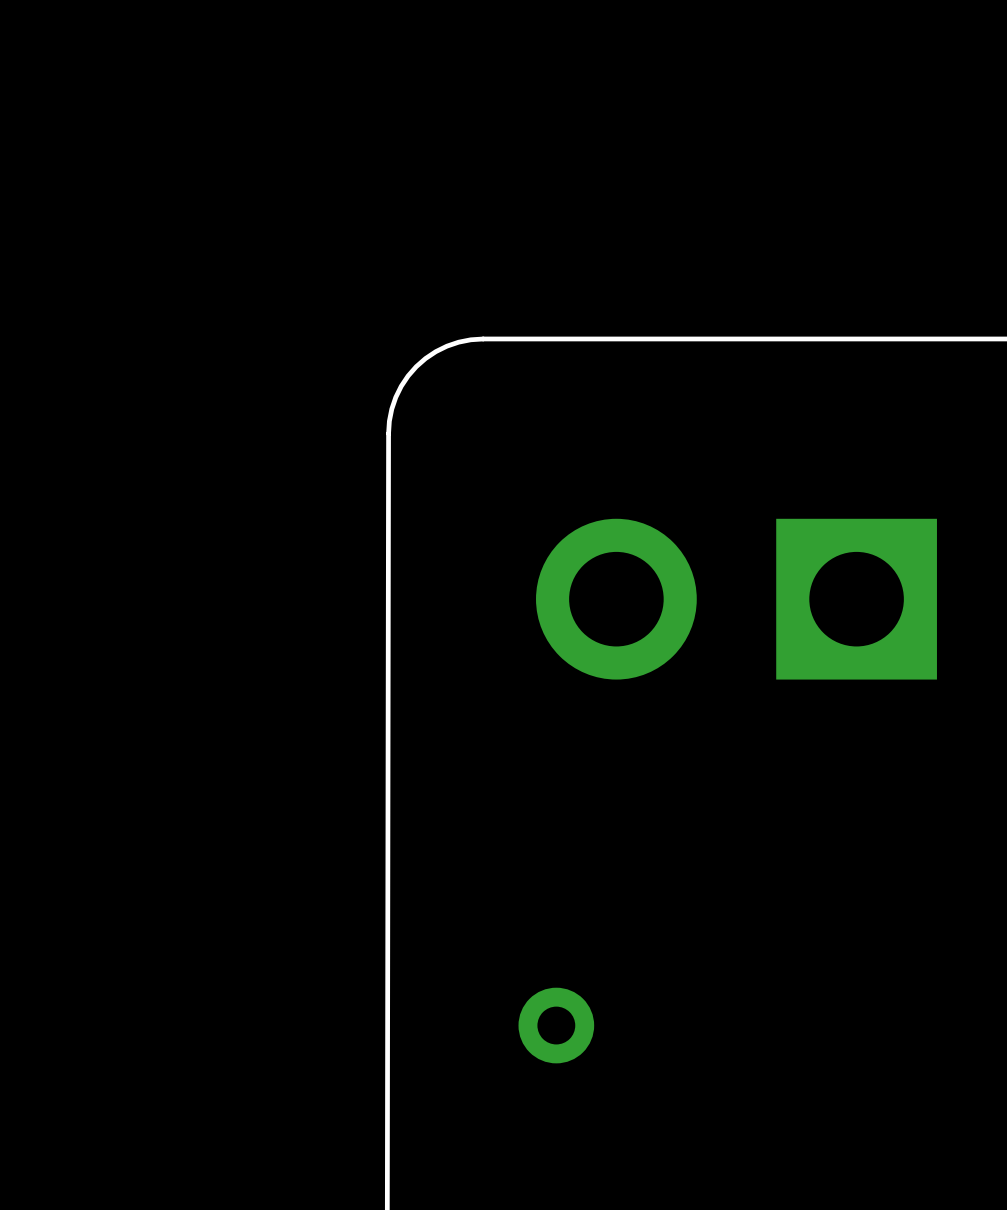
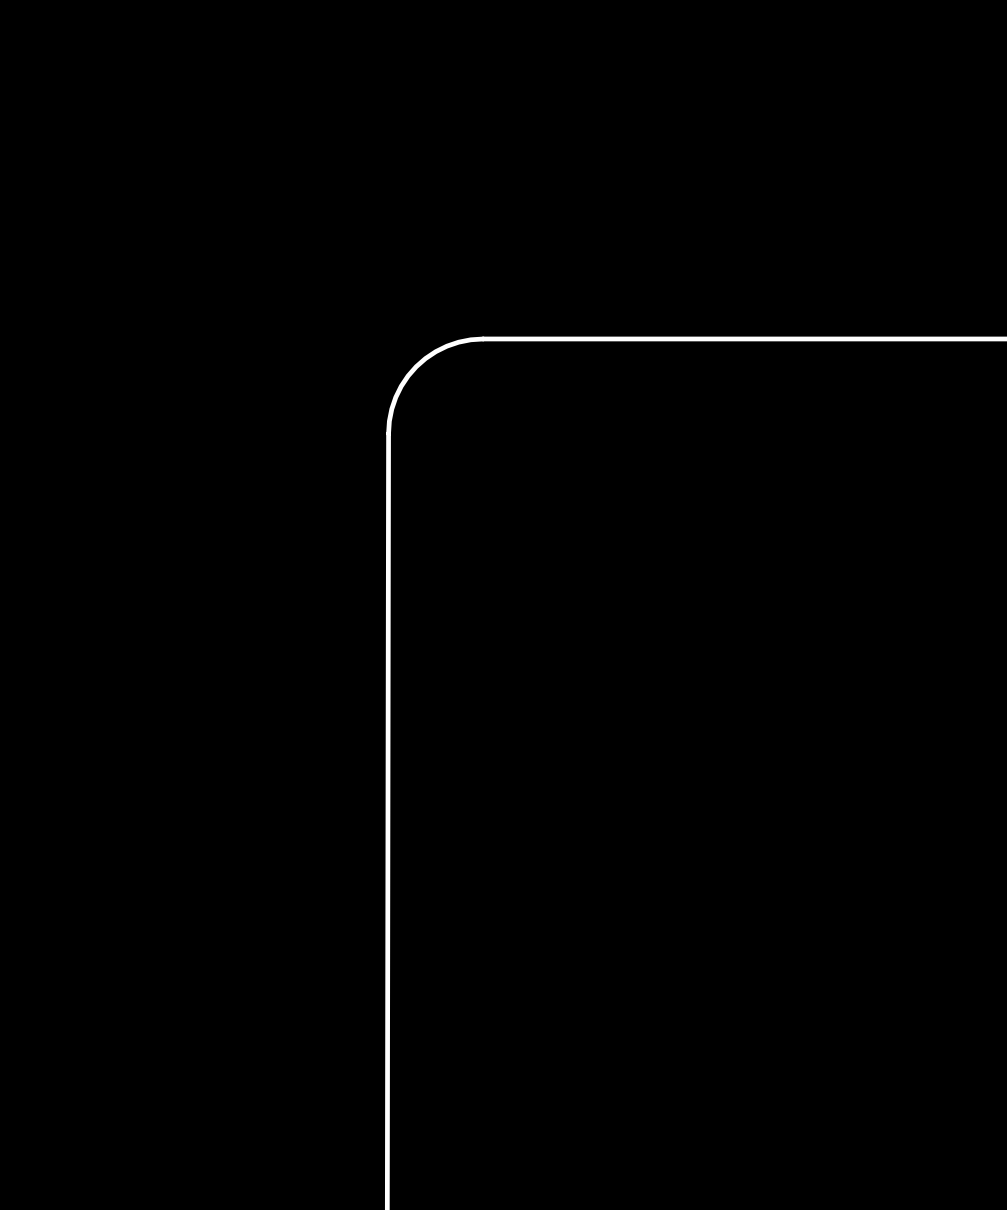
part: (736, 599) -> none
via: (556, 1025) -> none

